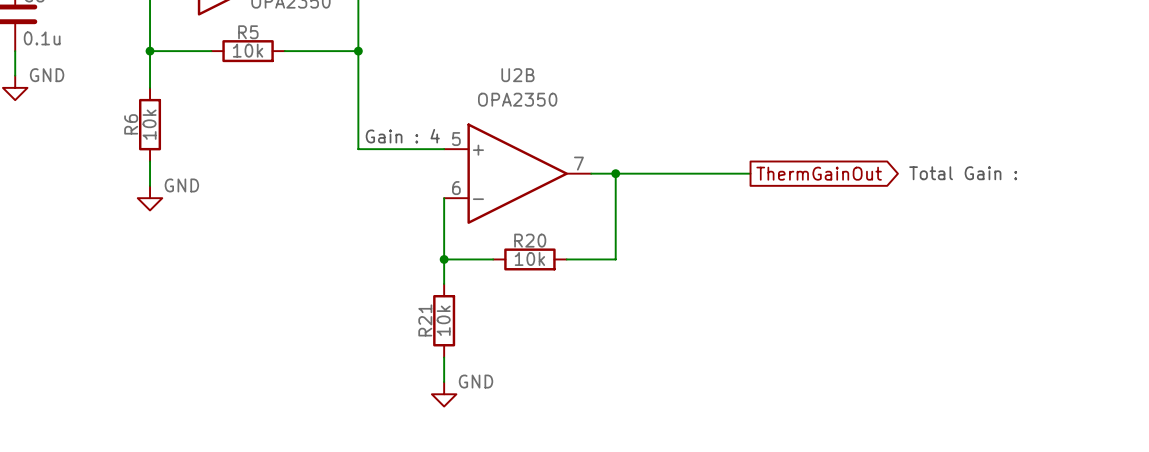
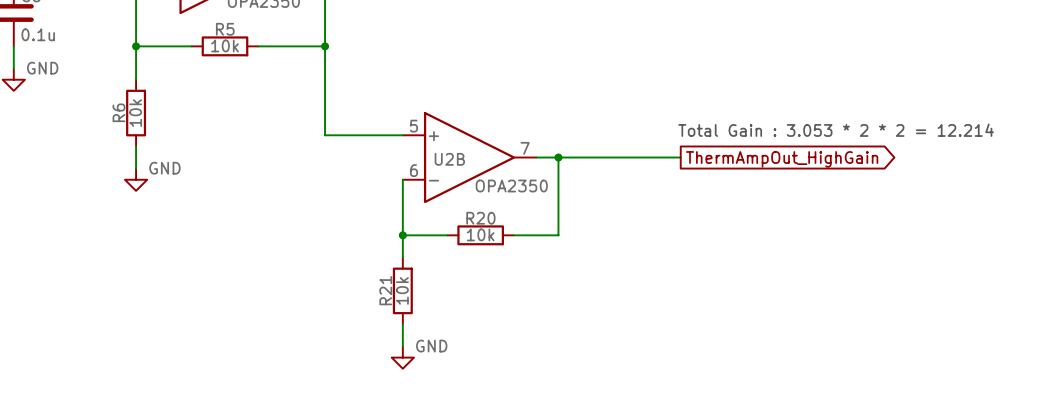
U2B name position: U2B (517, 75) -> U2B (449, 159)
U2B value position: OPA2350 (517, 99) -> OPA2350 (511, 186)
text: Gain : 4 (402, 136) -> none
text: none -> Total Gain : 3.053 * 2 * 2 = 12.214 (836, 130)
global label: ThermGainOut (819, 173) -> ThermAmpOut_HighGain (782, 159)
text: Total Gain : (963, 173) -> none

